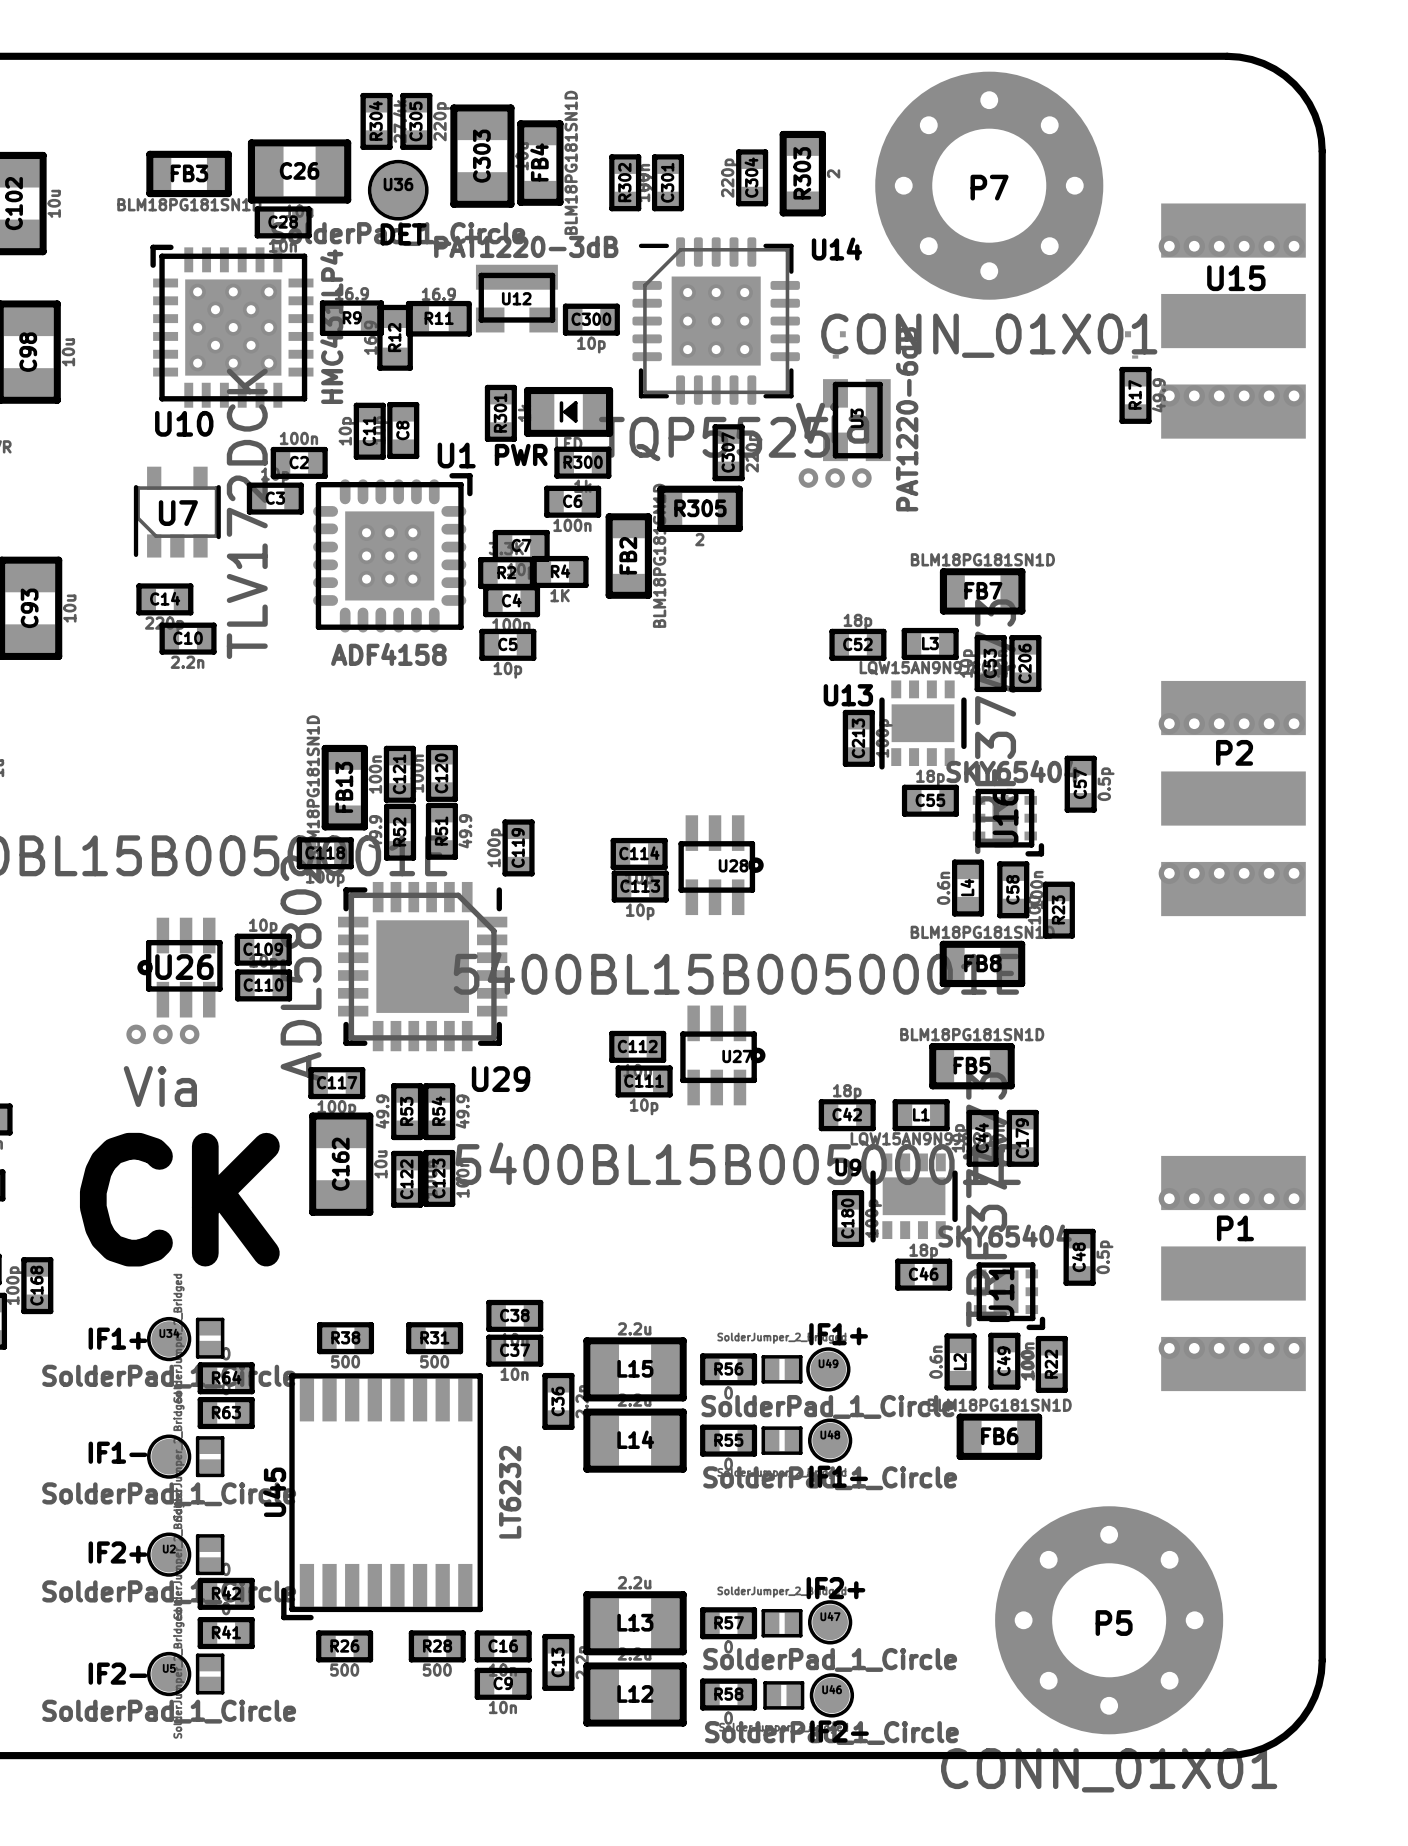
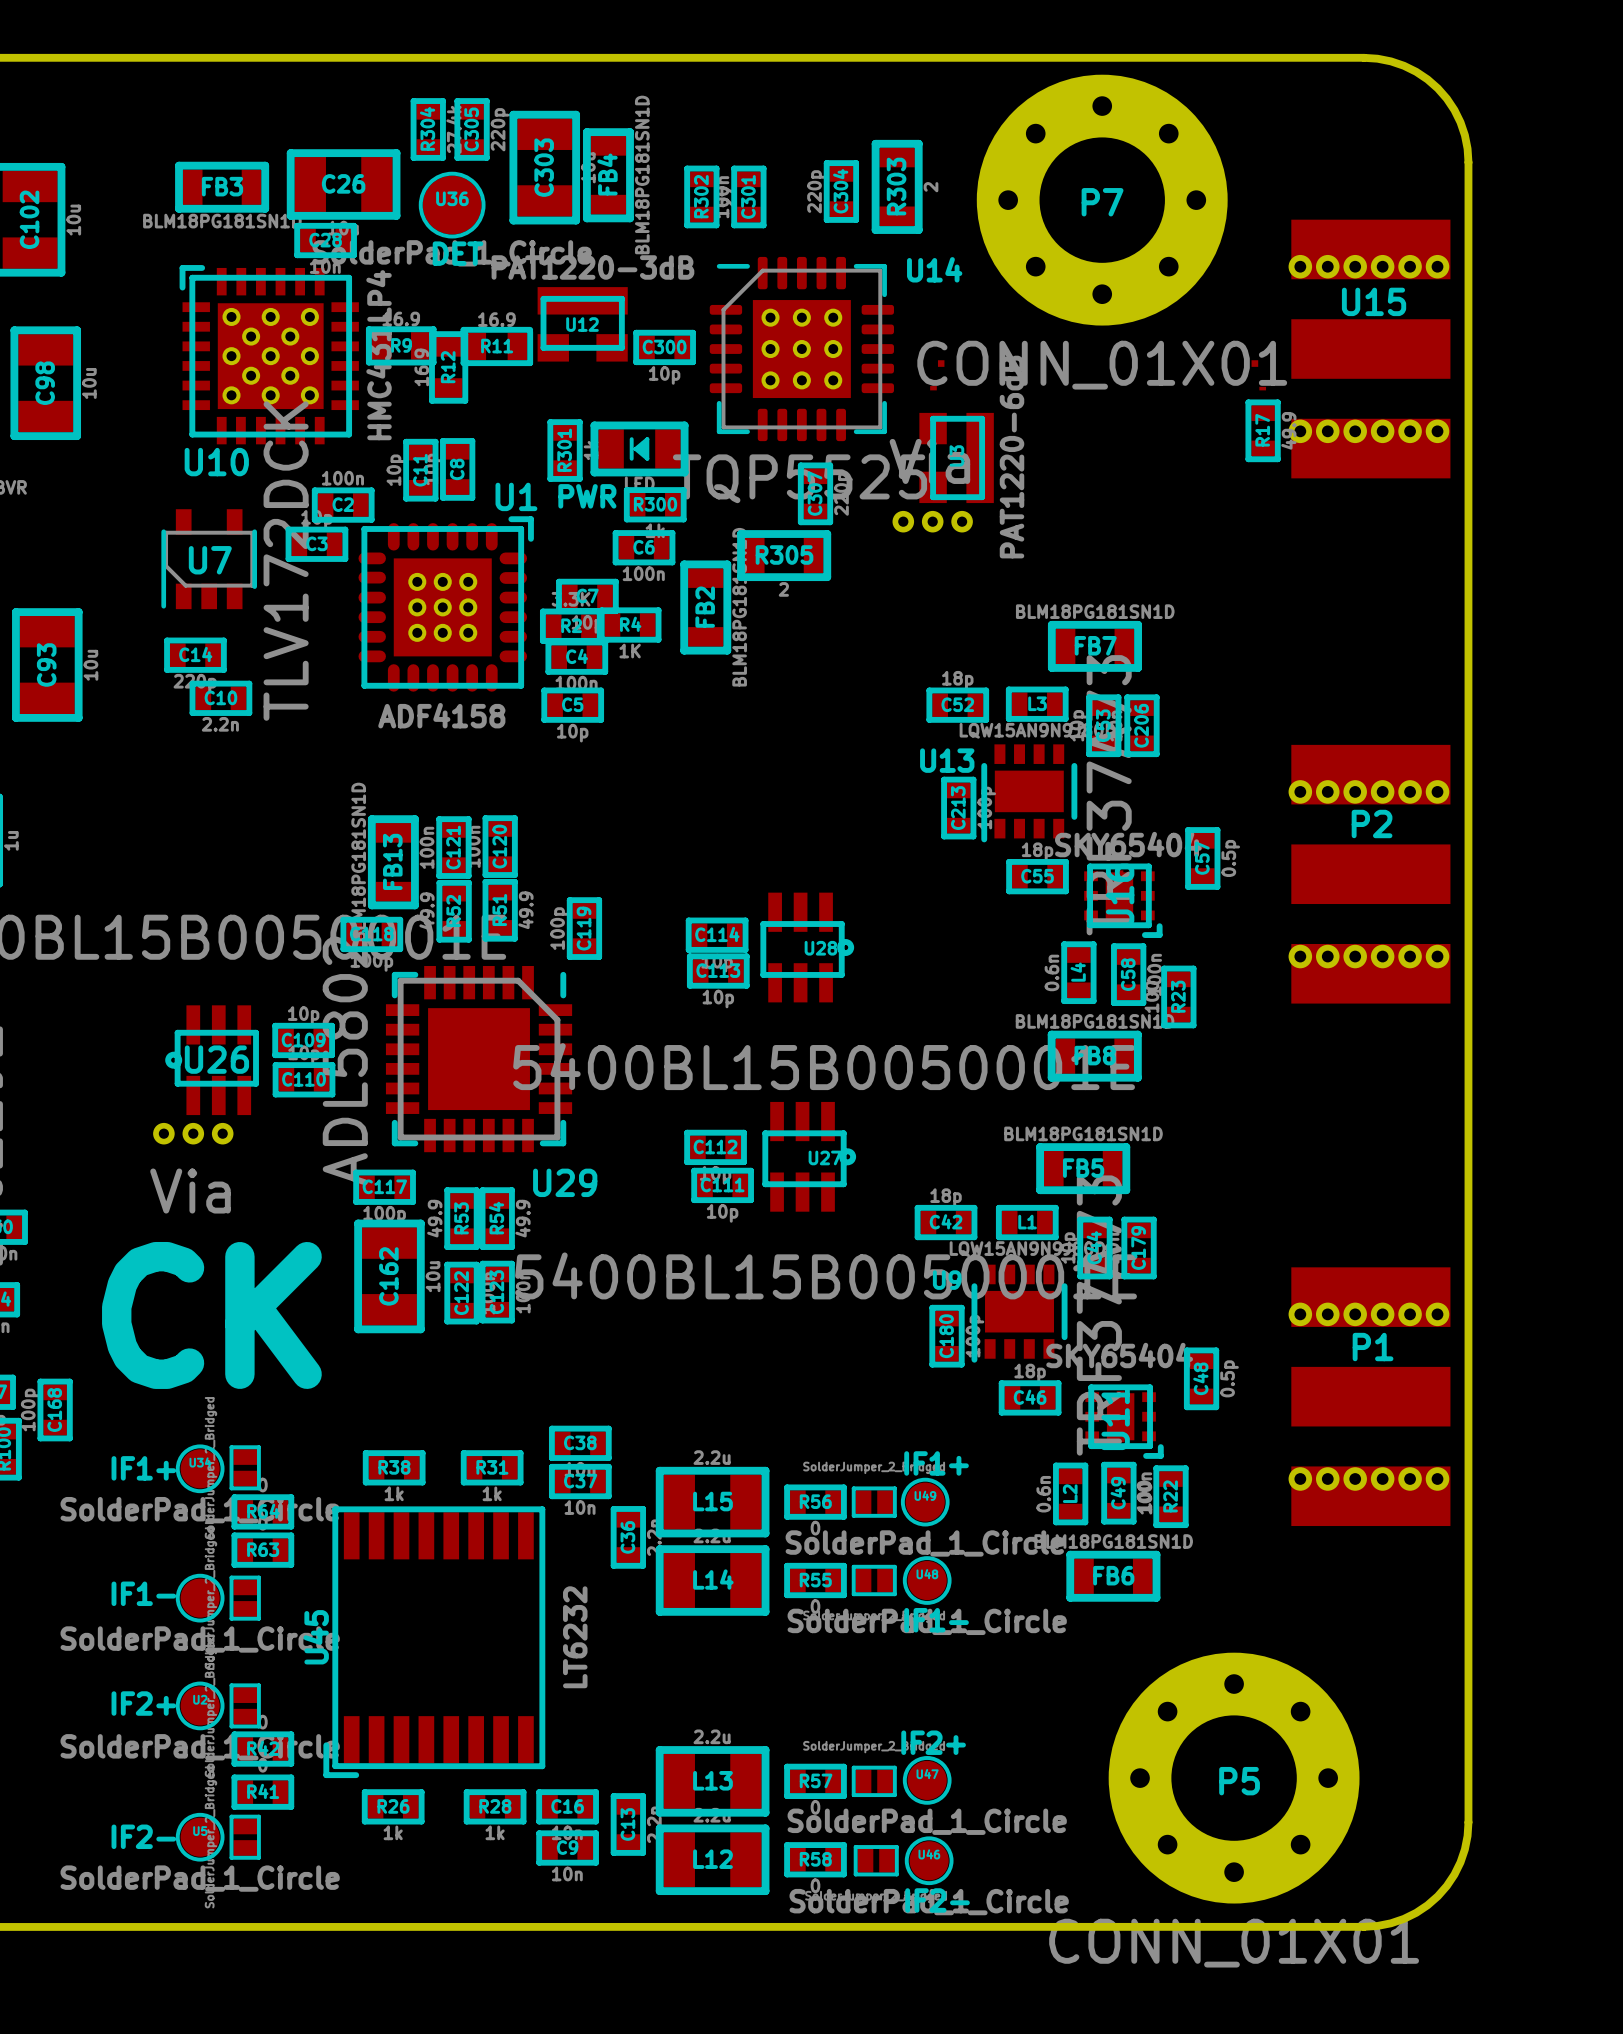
R38 value: 500 (345, 1361) -> 1k (394, 1493)
R31 value: 500 (434, 1361) -> 1k (492, 1493)
R26 value: 500 (344, 1670) -> 1k (393, 1832)
R28 value: 500 (437, 1670) -> 1k (495, 1832)

